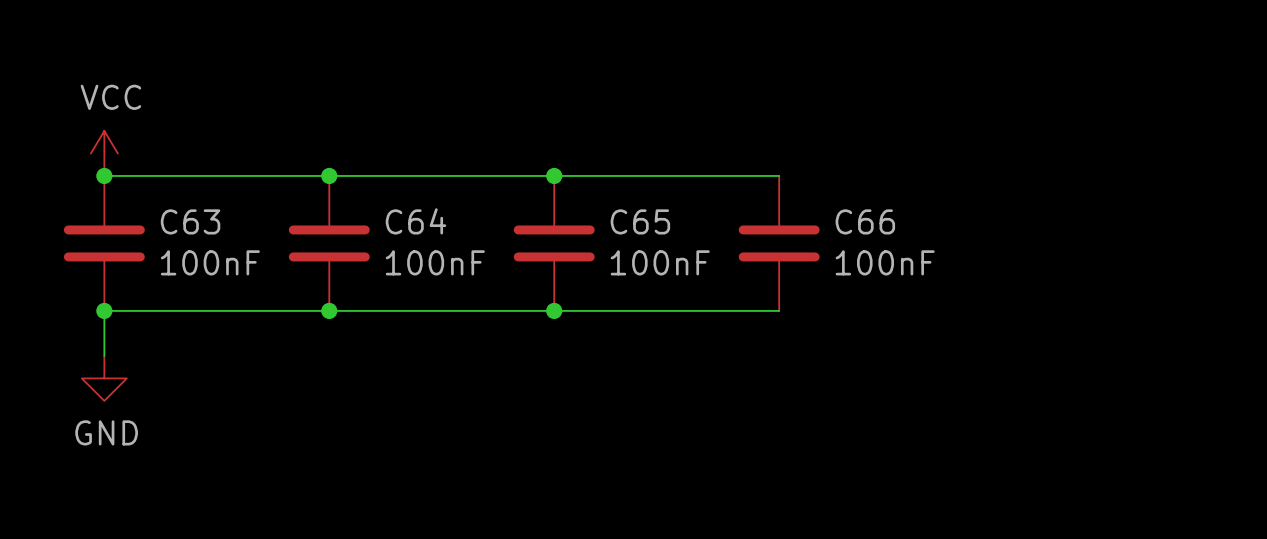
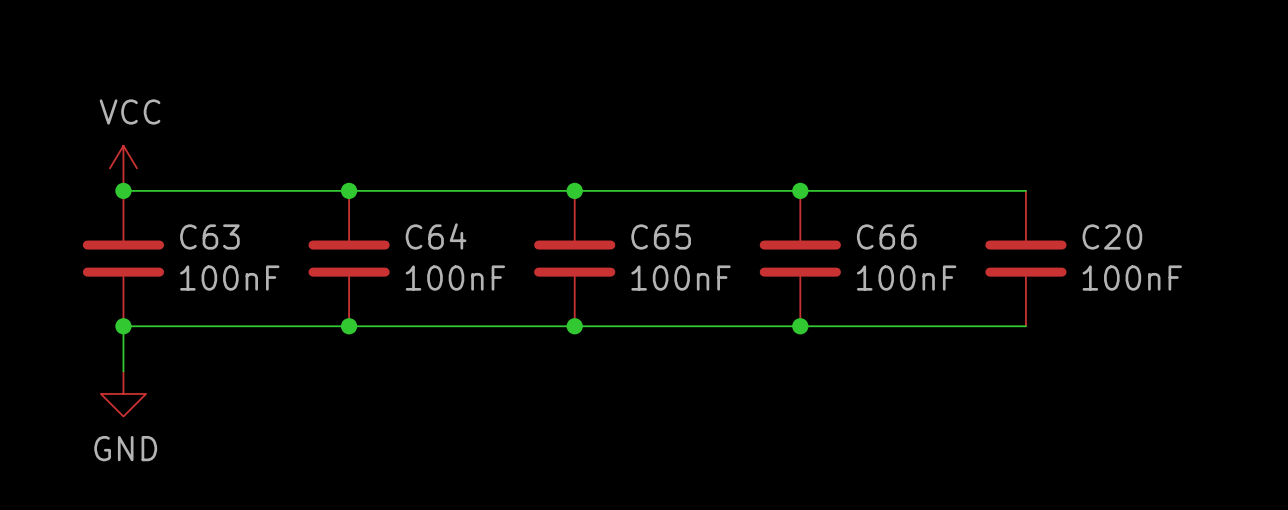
wire: none -> (800, 190) (1025, 190)
junction: none -> (800, 190)
C20: none -> 100nF (1025, 258)
wire: none -> (800, 326) (1025, 326)
junction: none -> (800, 326)

